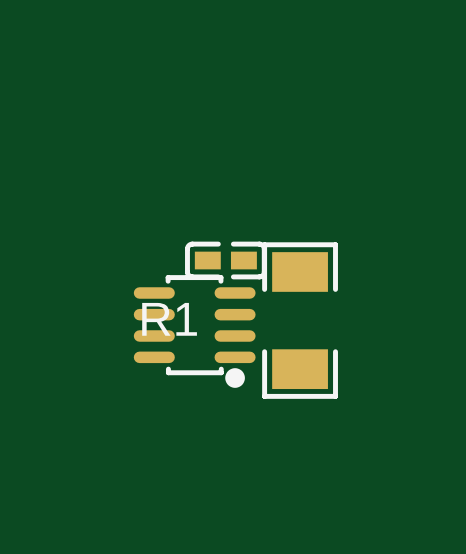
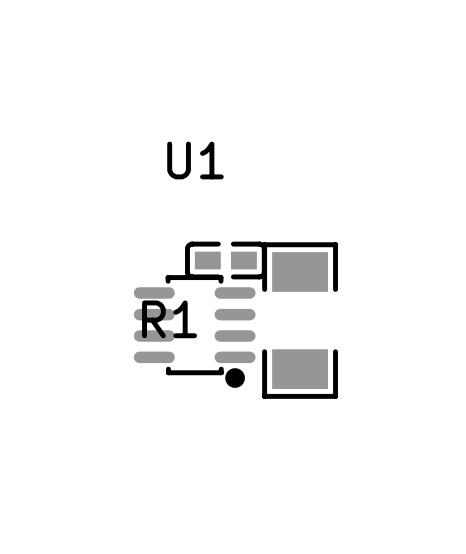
U1 name: none -> U1 (195, 160)

